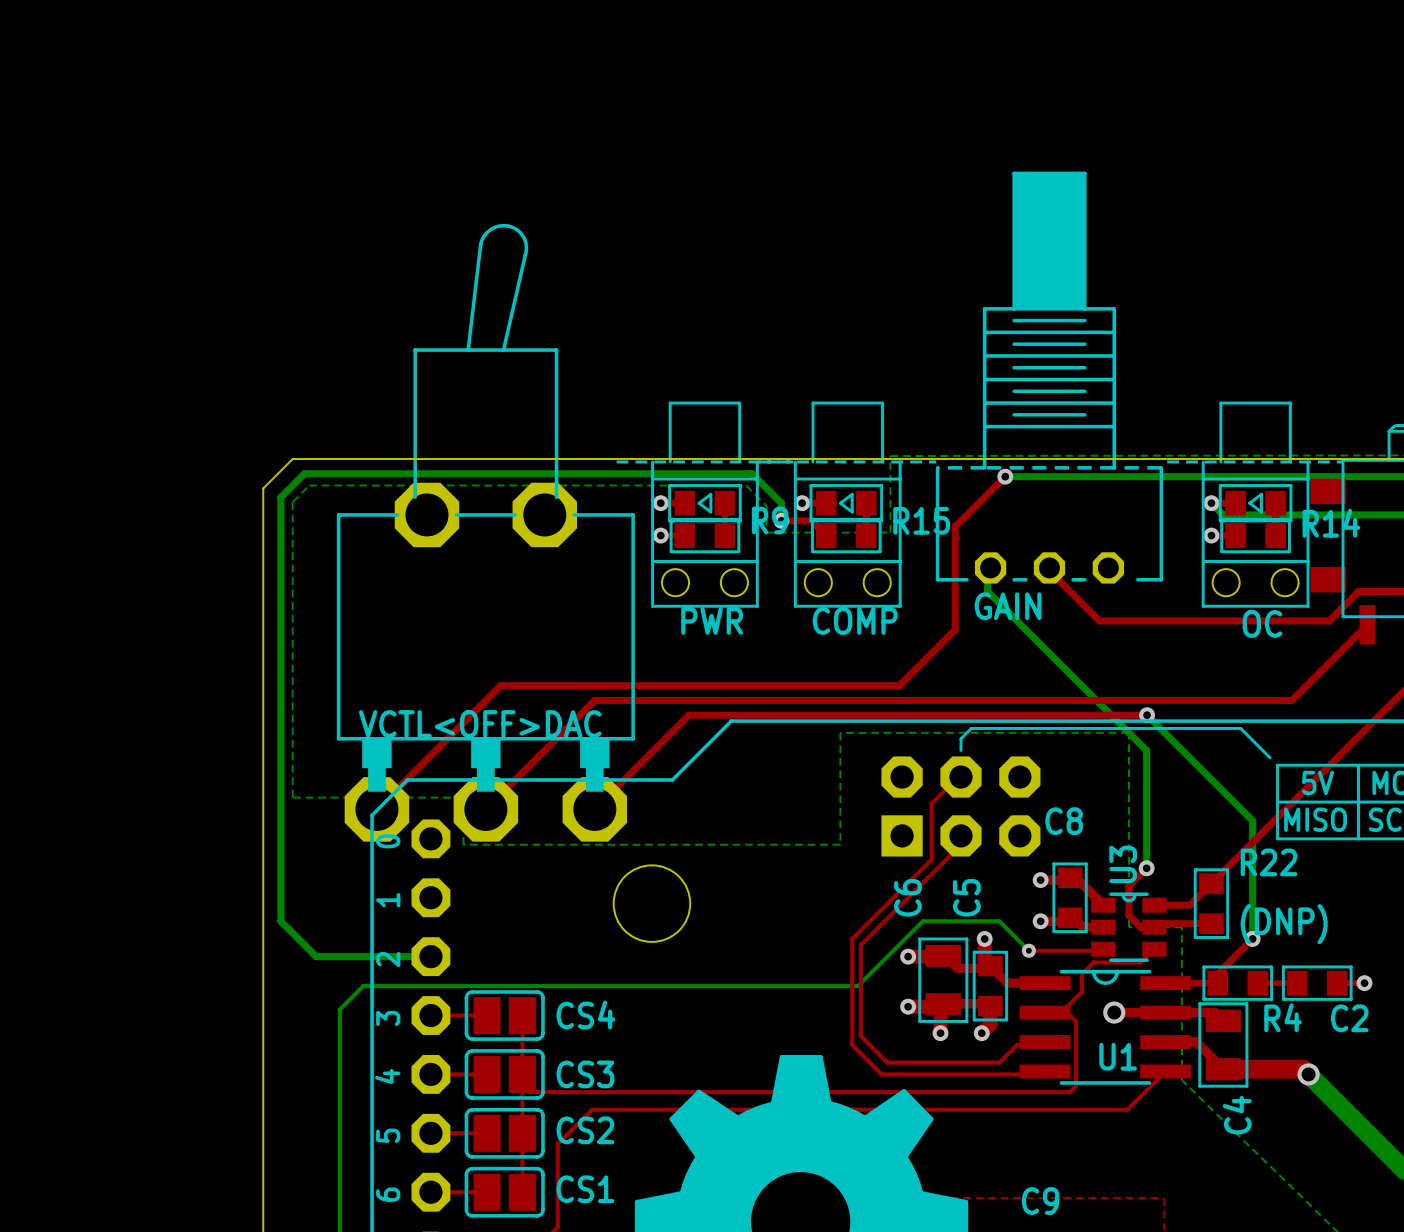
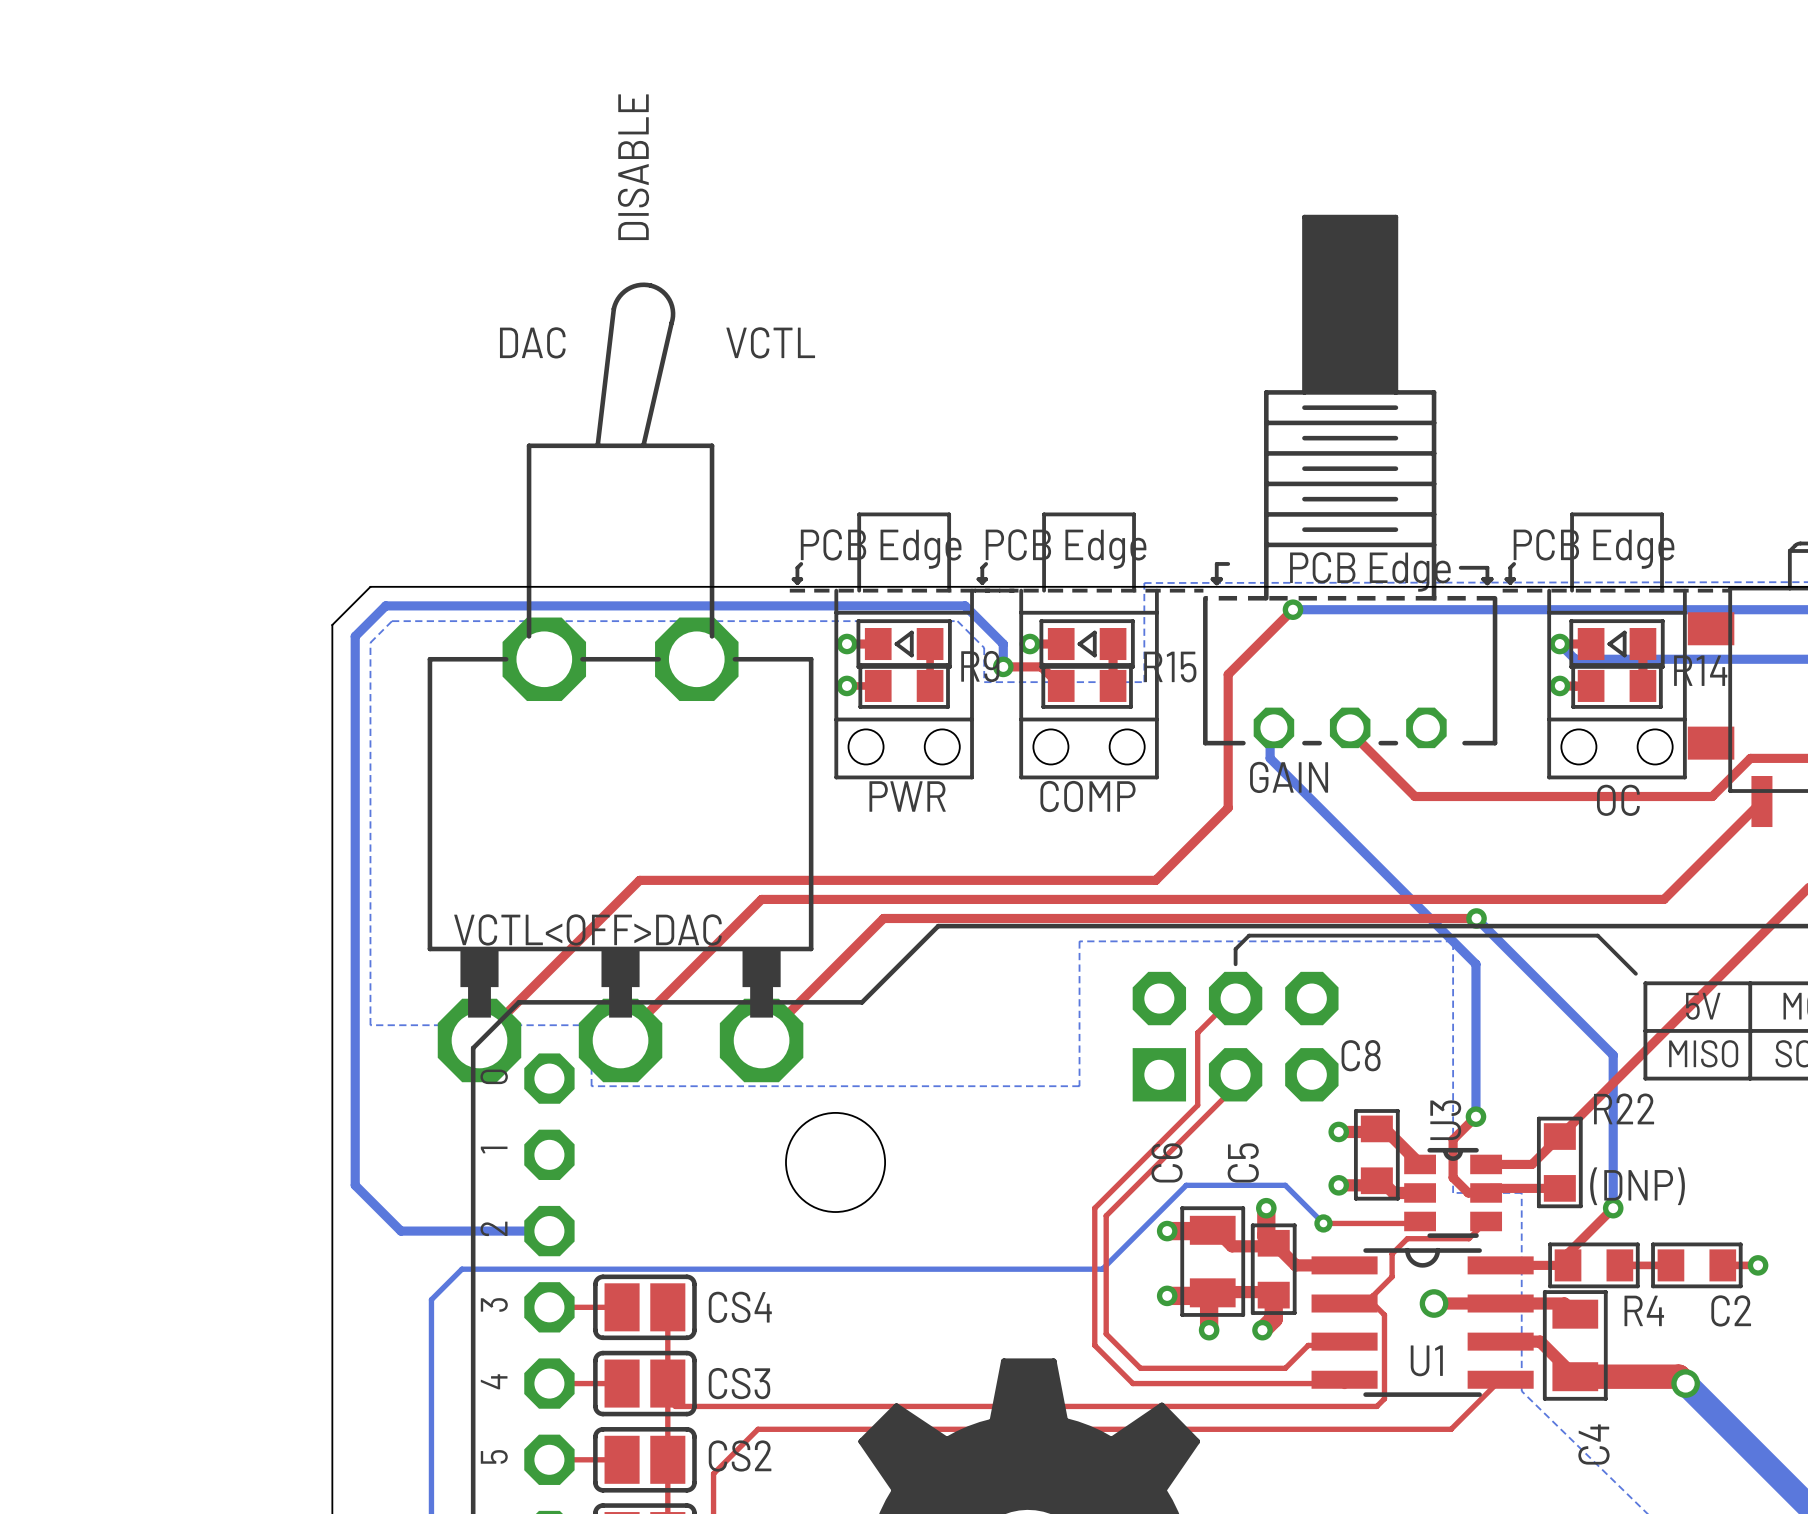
text: none -> DISABLE (633, 167)
GAIN footprint: [935, 171, 1164, 584] -> [1203, 214, 1498, 749]
text: none -> DAC (532, 342)
text: none -> VCTL (770, 342)
part footprint: [615, 401, 795, 608] -> [787, 512, 1021, 780]
part footprint: [757, 401, 938, 608] -> [972, 512, 1206, 780]
part footprint: [1165, 401, 1346, 608] -> [1500, 512, 1734, 780]

